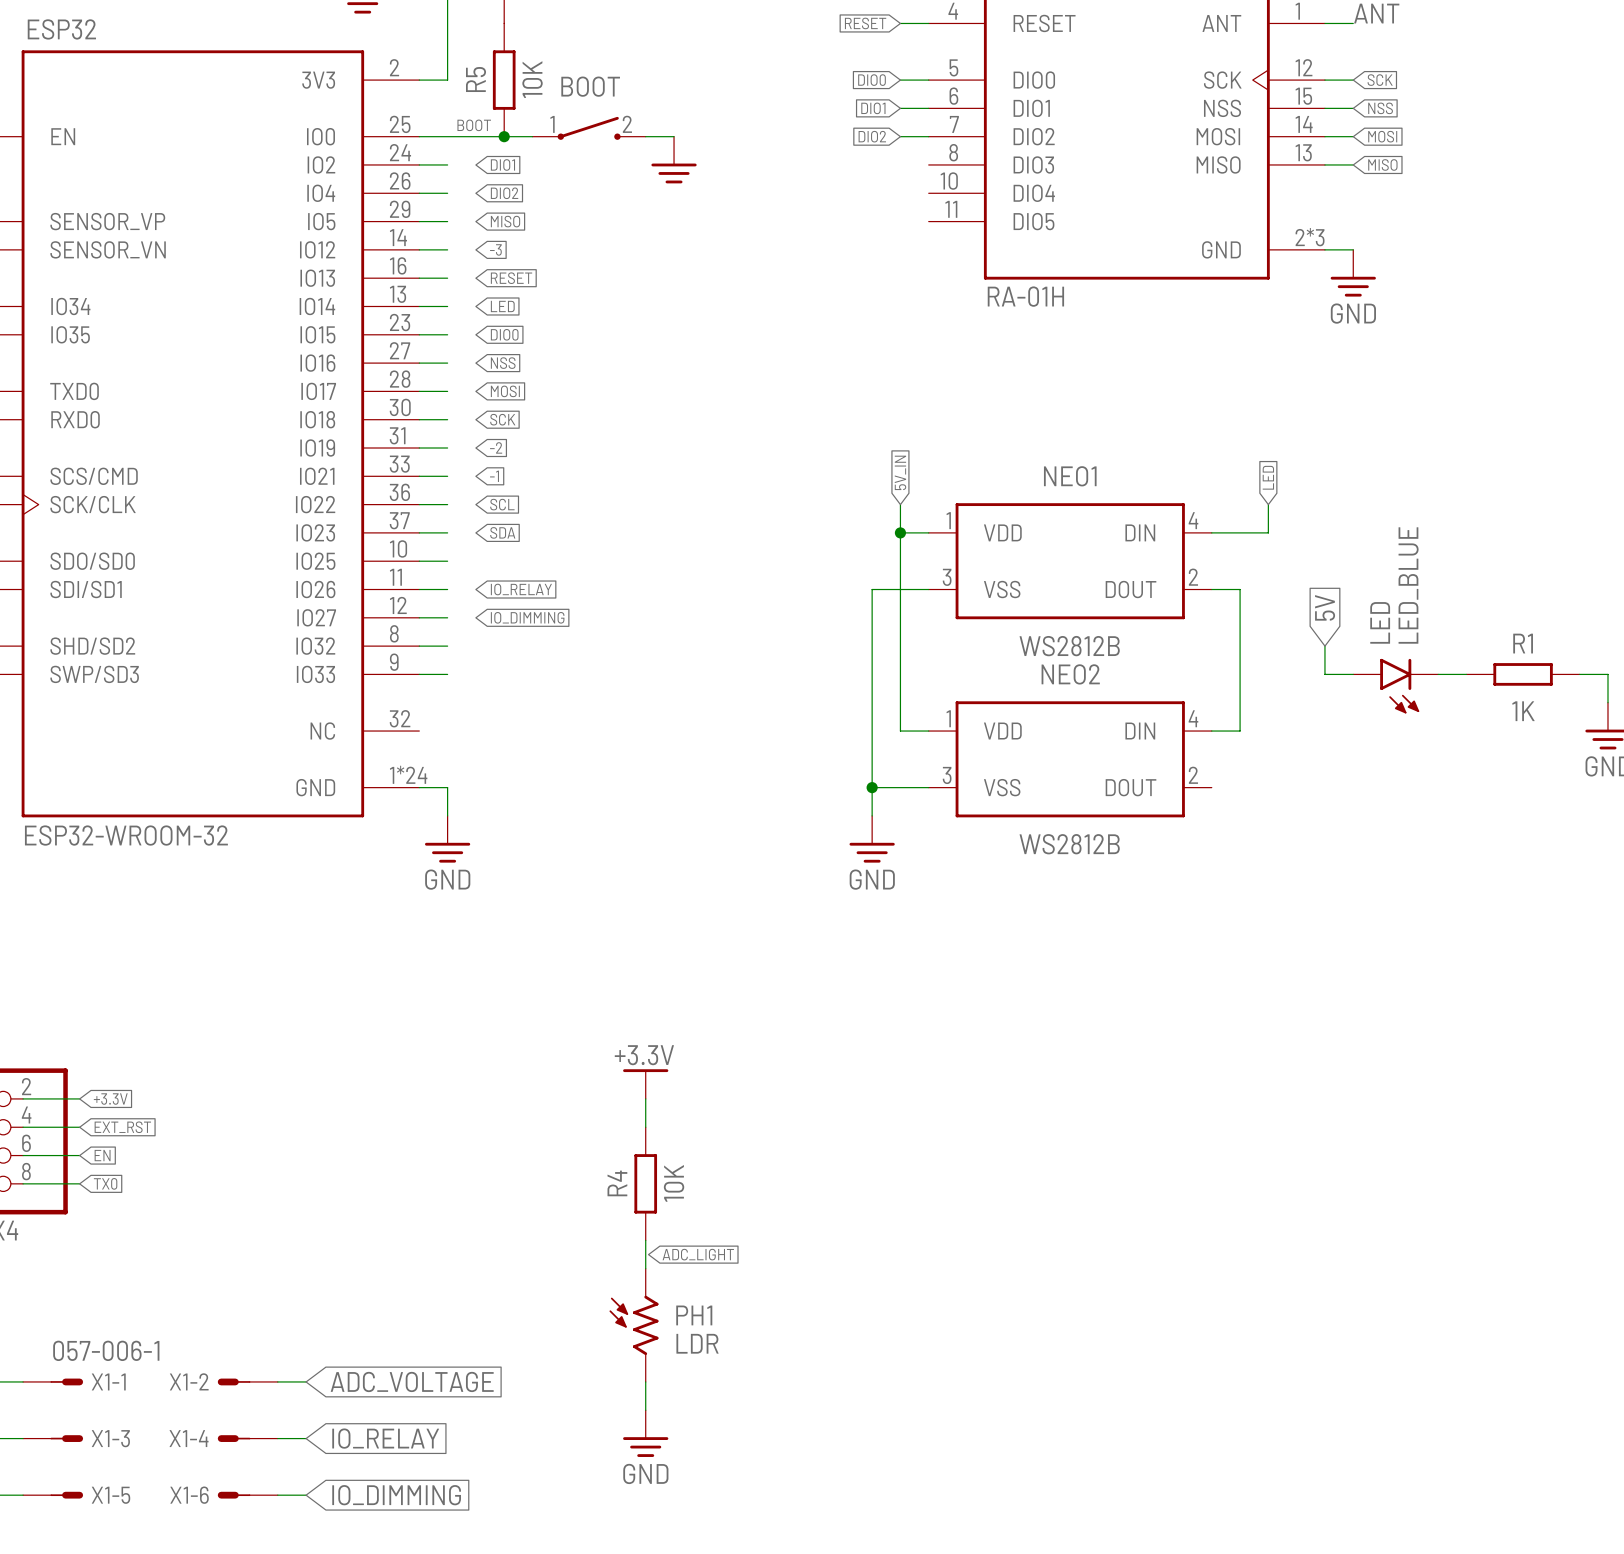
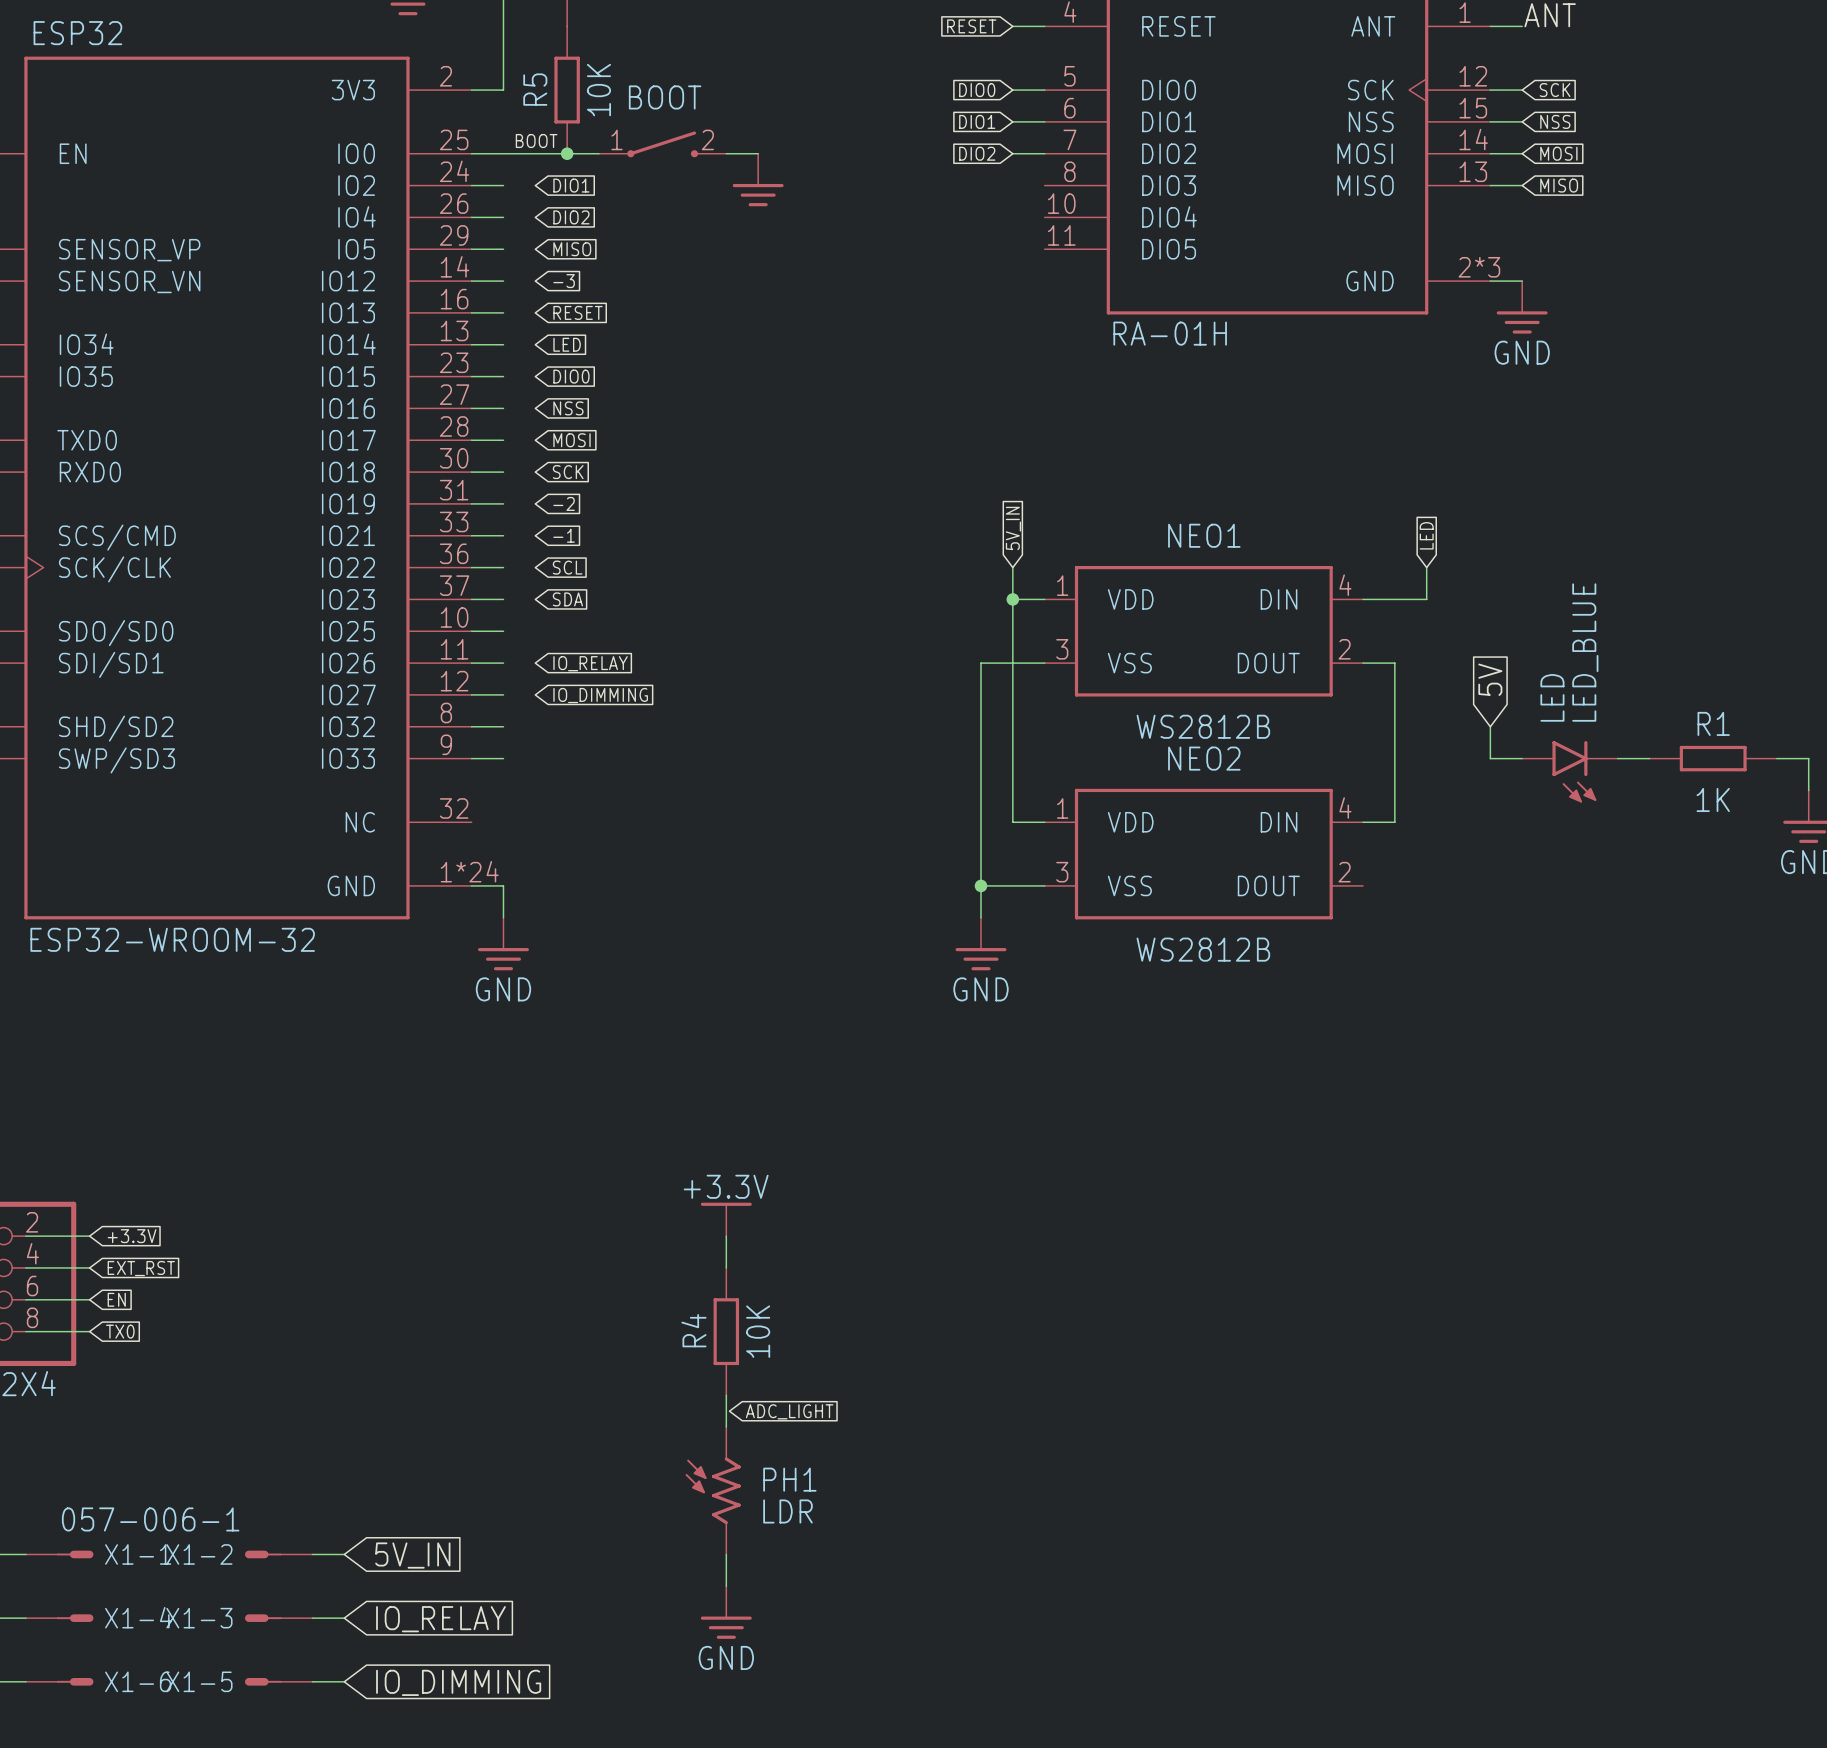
global label: ADC_VOLTAGE (412, 1381) -> 5V_IN (412, 1555)
X1-3 name: X1-3 (110, 1438) -> X1-4 (138, 1617)
X1-4 name: X1-4 (189, 1438) -> X1-3 (199, 1618)
X1-5 name: X1-5 (111, 1495) -> X1-6 (138, 1681)
X1-6 name: X1-6 (189, 1495) -> X1-5 (199, 1681)

